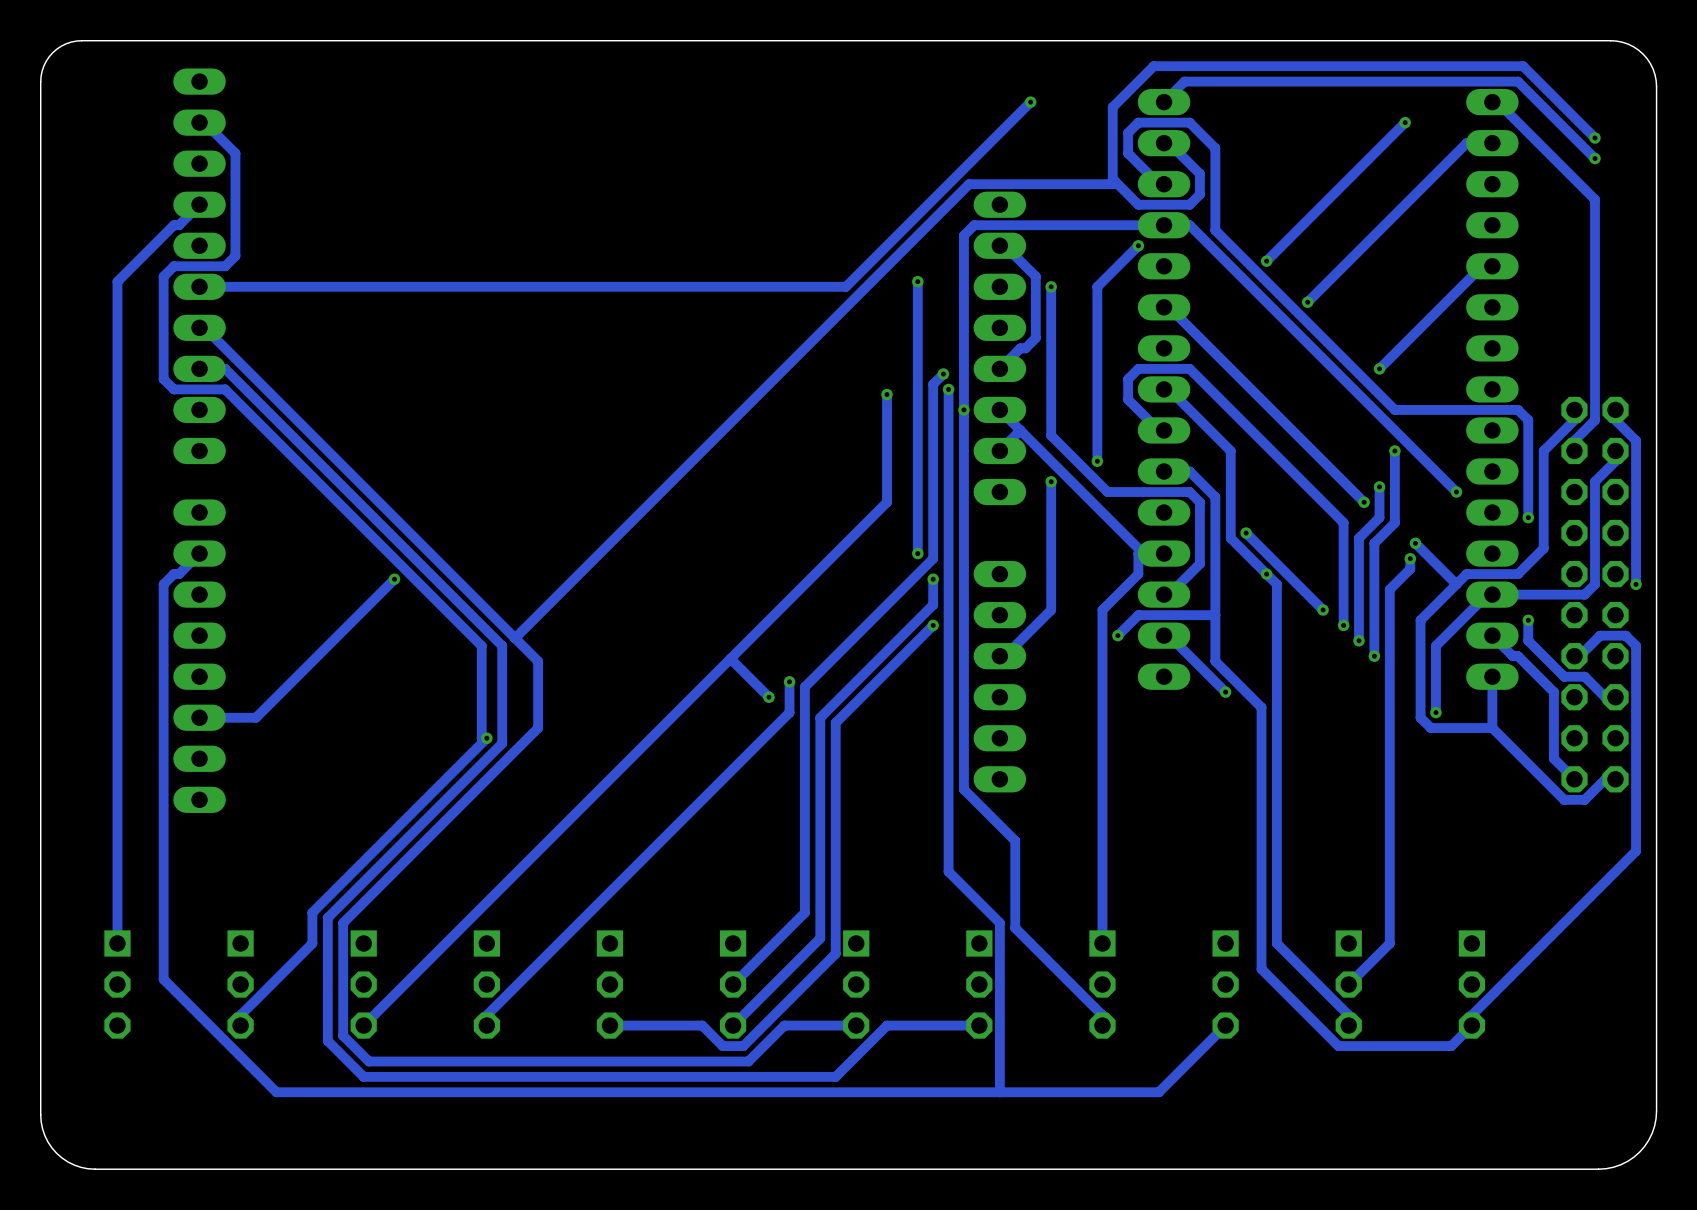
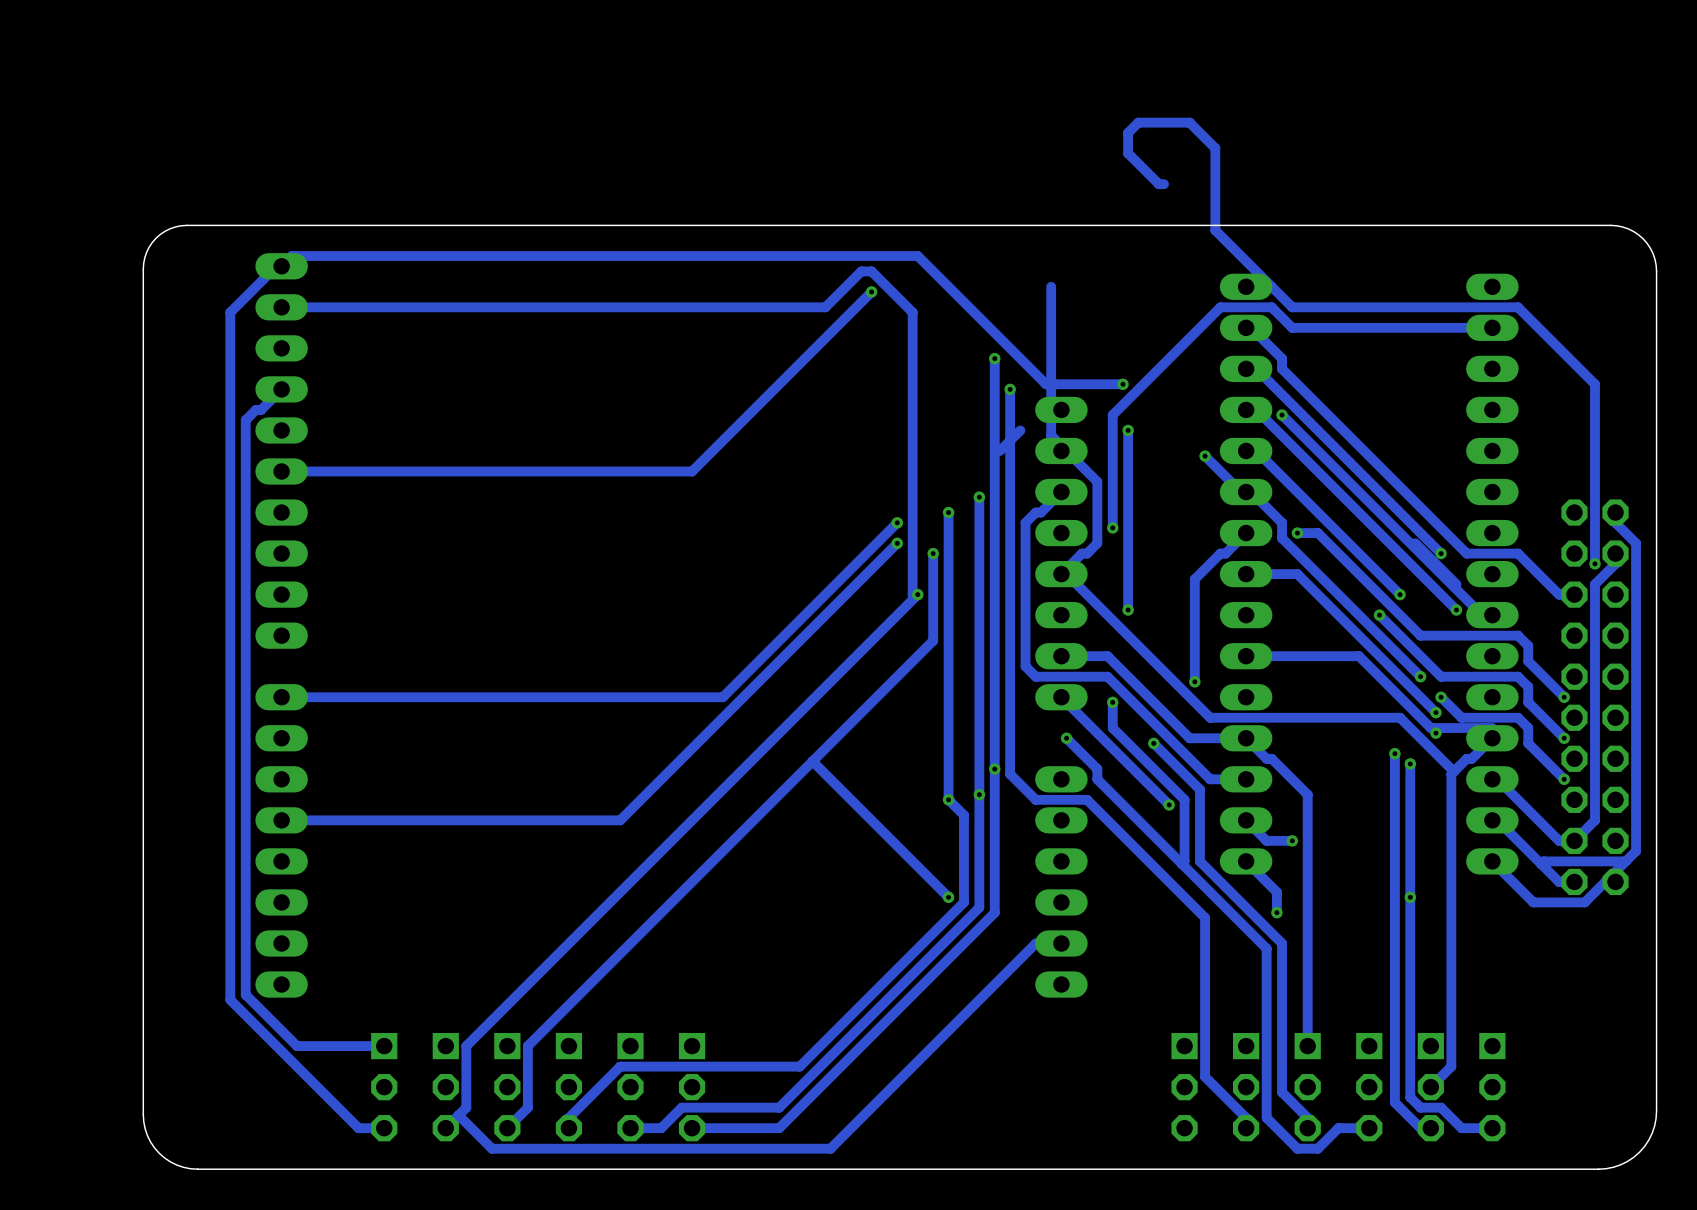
track: (1030, 102) (861, 271) -> (445, 1128) (466, 1107) (466, 1046) (917, 594) (912, 594) (912, 312) (871, 271) (861, 271)
via: (1030, 102) -> none
track: (1164, 102) (1184, 81) (1518, 81) (1594, 158) -> none
track: (1492, 102) (1497, 102) (1594, 199) (1594, 384) -> none
track: (199, 122) (204, 122) (235, 153) (235, 256) (225, 266) (173, 266) (163, 276) (163, 379) (173, 389) (225, 389) (481, 645) (481, 738) (486, 738) (312, 912) (312, 943) (240, 1015) (240, 1025) -> none
track: (1405, 122) (1266, 261) -> none
via: (1405, 122) -> none
track: (1594, 138) (1523, 66) (1153, 66) (1112, 107) (1112, 179) (1138, 204) (1189, 204) (1199, 194) (1199, 173) (1169, 143) (1164, 143) -> none
via: (1594, 138) -> none
track: (1492, 143) (1466, 143) (1307, 302) -> none
via: (1594, 158) -> none
track: (1115, 181) (1112, 184) (969, 184) (515, 638) -> none
track: (199, 204) (179, 225) (173, 225) (117, 281) (117, 943) -> none
track: (999, 245) (1005, 245) (1035, 276) (1035, 338) (1025, 348) (1020, 348) (999, 368) -> none
track: (1138, 245) (1097, 286) (1097, 461) -> none
via: (1138, 245) -> none
via: (1266, 261) -> none
part position: (199, 266) -> (281, 450)
track: (1492, 266) (1482, 266) (1379, 368) -> none
board edge: (1656, 271) (1656, 80) (1653, 68) (1643, 54) (1628, 44) (1616, 41) (81, 40) (61, 46) (46, 61) (40, 81) (41, 1121) (44, 1135) (51, 1147) (61, 1157) (81, 1167) (95, 1169) (197, 1169) -> (1656, 271) (1653, 253) (1643, 238) (1628, 228) (1610, 225) (186, 225) (165, 231) (149, 247) (143, 269) (143, 1114) (147, 1135) (159, 1153) (176, 1165) (197, 1169)
track: (917, 281) (917, 553) -> none
via position: (917, 281) -> (871, 291)
track: (845, 286) (199, 286) -> (845, 286) (825, 307) (281, 307)
via: (1051, 286) -> none
track: none -> (871, 291) (692, 471) (281, 471)
via: (1307, 302) -> none
track: (1164, 307) (1169, 307) (1364, 502) -> none
track: (1271, 307) (1189, 225) (974, 225) (963, 235) (963, 789) (1015, 840) (1015, 928) (1102, 1015) (1102, 1025) -> (1271, 307) (1220, 307) (1112, 415) (1112, 527)
track: (1292, 307) (1394, 409) (1518, 409) (1528, 420) (1528, 517) -> (1292, 307) (1518, 307) (1594, 384)
track: (199, 327) (204, 327) (538, 661) (538, 728) (343, 922) (343, 1035) (368, 1061) (748, 1061) (784, 1025) (856, 1025) -> none
track: none -> (1246, 327) (1251, 327) (1282, 358) (1282, 368) (1466, 553) (1518, 553) (1559, 594)
track: (1292, 327) (1456, 492) -> (1292, 327) (1492, 327)
part position: (999, 348) -> (1061, 553)
track: none -> (994, 358) (994, 912) (779, 1128) (692, 1128)
via: none -> (994, 358)
track: (199, 368) (225, 368) (502, 645) (502, 743) (327, 917) (327, 1040) (363, 1076) (835, 1076) (887, 1025) (979, 1025) -> none
track: none -> (1246, 368) (1256, 368) (1441, 553)
via: (1379, 368) -> none
track: (943, 374) (933, 384) (933, 553) -> none
via: (943, 374) -> none
track: none -> (1123, 384) (1046, 384) (917, 256) (291, 256) (281, 266) (281, 261) (230, 312) (230, 999) (358, 1128) (384, 1128)
via: none -> (1123, 384)
track: none -> (281, 389) (261, 409) (255, 409) (245, 420) (245, 994) (297, 1046) (384, 1046)
track: (948, 389) (948, 512) -> none
via: (948, 389) -> none
track: none -> (1010, 389) (1010, 774) (1035, 799) (1087, 799) (1205, 917) (1205, 1076) (1246, 1117) (1246, 1128)
via: none -> (1010, 389)
track: (1164, 389) (1169, 389) (1230, 450) (1230, 538) (1276, 584) (1276, 892) -> (1246, 861) (1276, 892)
part: (1164, 389) -> none
part: (1492, 389) -> none
track: (887, 394) (887, 502) (363, 1025) -> none
via: (887, 394) -> none
via: (963, 409) -> none
track: (999, 409) (1143, 553) -> none
track: none -> (1246, 409) (1256, 409) (1456, 610)
track: (1574, 409) (1574, 420) (1543, 450) (1543, 548) (1518, 574) (1466, 574) (1420, 620) (1420, 717) -> (1246, 656) (1359, 656) (1420, 717)
track: (1615, 409) (1615, 420) (1636, 440) (1636, 543) -> (1615, 512) (1615, 522) (1636, 543)
track: none -> (1282, 415) (1482, 615) (1492, 615)
via: none -> (1282, 415)
track: (1594, 420) (1574, 440) (1574, 450) -> none
track: none -> (1128, 430) (1128, 610)
via: none -> (1128, 430)
track: (1164, 430) (1158, 430) (1128, 399) (1128, 379) (1138, 368) (1189, 368) (1343, 522) (1343, 625) -> none
track: none -> (1246, 450) (1256, 450) (1400, 594)
track: (1394, 450) (1394, 522) (1374, 543) (1374, 656) -> none
via: (1394, 450) -> none
track: (1615, 450) (1615, 461) (1594, 481) -> (1594, 420) (1594, 481)
track: none -> (1205, 456) (1241, 492) (1251, 492) (1282, 522) (1282, 538) (1420, 676)
via: none -> (1205, 456)
via: (1097, 461) -> none
track: (1164, 471) (1189, 471) (1215, 497) (1215, 661) (1261, 707) (1261, 969) (1338, 1046) (1451, 1046) (1471, 1025) (1471, 1015) (1584, 902) -> (1492, 861) (1533, 902) (1584, 902)
track: (1051, 481) (1051, 610) (1005, 656) (999, 656) -> none
via: (1051, 481) -> none
track: (1097, 481) (1107, 492) (1189, 492) (1199, 502) (1199, 563) (1169, 594) (1164, 594) -> (1097, 481) (1097, 543) (1087, 553) (1081, 553) (1061, 574) (1066, 574) (1210, 717) (1400, 717) (1453, 771)
track: (1379, 486) (1379, 517) (1359, 538) (1359, 640) -> none
via: (1379, 486) -> none
track: none -> (1061, 492) (1040, 512) (1035, 512) (1025, 522) (1025, 666) (1035, 676) (1107, 676) (1210, 779) (1246, 779)
via: (1456, 492) -> none
track: none -> (979, 497) (979, 907) (779, 1107) (681, 1107) (661, 1128) (630, 1128)
via: none -> (979, 497)
via: (1364, 502) -> none
via: none -> (948, 512)
via: (1528, 517) -> none
track: none -> (897, 522) (722, 697) (281, 697)
via: none -> (897, 522)
via: none -> (1112, 527)
track: (1246, 533) (1323, 610) -> (1246, 533) (1225, 553) (1220, 553) (1194, 579) (1194, 681)
via: (1246, 533) -> none
track: none -> (1297, 533) (1317, 533) (1420, 635) (1518, 635) (1528, 645) (1528, 661) (1564, 697)
via: none -> (1297, 533)
track: none -> (897, 543) (620, 820) (281, 820)
via: none -> (897, 543)
via: (1415, 543) -> none
track: (199, 553) (179, 574) (173, 574) (163, 584) (163, 979) (276, 1092) (1158, 1092) (1225, 1025) -> none
via: (917, 553) -> none
via: none -> (933, 553)
track: (1164, 553) (1138, 553) (1138, 574) (1102, 610) (1102, 943) -> none
via: none -> (1441, 553)
track: none -> (1615, 553) (1615, 563) (1594, 584) (1594, 820) (1574, 840) (1559, 840) (1497, 779) (1492, 779)
track: (933, 558) (804, 686) (804, 912) (733, 984) -> (933, 558) (933, 579)
track: (1410, 558) (1410, 568) (1389, 589) (1389, 943) (1348, 984) -> none
via: (1410, 558) -> none
track: (1594, 563) (1594, 584) (1584, 594) (1574, 594) -> none
via: none -> (1594, 563)
part: none -> (1246, 574)
via: (1266, 574) -> none
part: none -> (1492, 574)
track: (394, 579) (255, 717) (199, 717) -> none
via: (394, 579) -> none
via: (933, 579) -> none
via: (1636, 584) -> none
via: none -> (917, 594)
via: none -> (1400, 594)
track: (1559, 594) (1487, 594) (1435, 645) (1435, 712) -> (1246, 574) (1297, 574) (1435, 712)
part position: (1594, 594) -> (1594, 697)
track: (933, 604) (820, 717) (820, 938) (733, 1025) -> (933, 604) (933, 640) (527, 1046) (527, 1107) (507, 1128)
via: (1323, 610) -> none
via: none -> (1456, 610)
track: (1215, 615) (1138, 615) (1117, 635) -> none
track: none -> (1379, 615) (1441, 676) (1518, 676) (1528, 686) (1528, 702) (1564, 738)
via: none -> (1379, 615)
track: (1528, 620) (1528, 640) (1564, 676) (1584, 676) (1605, 697) (1615, 697) -> none
via: (1528, 620) -> none
track: (933, 625) (835, 722) (835, 953) (743, 1046) (722, 1046) (702, 1025) (609, 1025) -> none
via: (933, 625) -> none
via: (1343, 625) -> none
via position: (1117, 635) -> (1128, 610)
track: (1164, 635) (1169, 635) (1225, 692) -> none
track: (1492, 635) (1512, 656) (1518, 656) (1553, 692) (1553, 758) (1574, 779) -> none
via: (1359, 640) -> none
track: (1636, 645) (1625, 635) (1600, 635) (1579, 656) (1574, 656) -> (1636, 645) (1636, 584)
part position: (199, 656) -> (281, 840)
track: none -> (1061, 656) (1107, 656) (1189, 738) (1246, 738) (1266, 758) (1271, 758) (1307, 794) (1307, 1046)
via: (1374, 656) -> none
track: (730, 658) (769, 697) -> none
part position: (999, 676) -> (1061, 881)
via: none -> (1420, 676)
track: (1492, 676) (1492, 728) (1564, 799) (1584, 799) (1605, 779) (1615, 779) -> none
track: (789, 681) (789, 712) (486, 1015) (486, 1025) -> none
via: (789, 681) -> none
via position: (1225, 692) -> (1194, 681)
via: (769, 697) -> none
track: none -> (1061, 697) (1169, 804)
track: none -> (1441, 697) (1461, 717) (1518, 717) (1528, 728) (1528, 743) (1564, 779)
via: none -> (1441, 697)
via: none -> (1564, 697)
track: none -> (1112, 702) (1112, 728) (1184, 799) (1184, 861) (1182, 863)
via: none -> (1112, 702)
via: none -> (1435, 733)
via: (486, 738) -> none
track: none -> (1066, 738) (1097, 769) (1097, 779) (1266, 948) (1266, 1117) (1297, 1148) (1317, 1148) (1338, 1128) (1369, 1128)
via: none -> (1066, 738)
track: none -> (1492, 738) (1471, 758) (1466, 758) (1451, 774) (1451, 1066) (1430, 1087)
via: none -> (1564, 738)
track: none -> (1153, 743) (1199, 789) (1199, 861) (1282, 943) (1282, 1092) (1307, 1117) (1307, 1128)
via: none -> (1153, 743)
track: none -> (1394, 753) (1394, 1102) (1420, 1128) (1430, 1128)
via: none -> (1394, 753)
track: none -> (812, 761) (948, 897)
track: none -> (1410, 763) (1410, 1097) (1420, 1107) (1441, 1107) (1461, 1128) (1492, 1128)
via: none -> (1410, 763)
via: none -> (994, 769)
via: none -> (1564, 779)
via: none -> (979, 794)
track: (948, 799) (948, 871) (999, 922) (999, 1092) -> (948, 799) (963, 815) (963, 902) (799, 1066) (620, 1066) (568, 1117) (568, 1128)
via: none -> (948, 799)
via: none -> (1169, 804)
track: none -> (1246, 820) (1266, 840) (1292, 840)
track: none -> (1492, 820) (1497, 820) (1559, 881) (1574, 881)
via: none -> (1292, 840)
track: none -> (1625, 861) (1543, 861) (1541, 863)
via: none -> (948, 897)
via: none -> (1410, 897)
track: (1276, 912) (1276, 943) (1348, 1015) (1348, 1025) -> none
via: none -> (1276, 912)
track: none -> (1061, 943) (1035, 943) (830, 1148) (491, 1148) (458, 1115)
part: (117, 984) -> none
part: (240, 984) -> none
part: (363, 984) -> none
part: (486, 984) -> none
part: (609, 984) -> none
part: (733, 984) -> none
part: (856, 984) -> none
part: (979, 984) -> none
part: (1102, 984) -> none
part: (1225, 984) -> none
part: (1348, 984) -> none
part: (1471, 984) -> none
part: none -> (384, 1087)
part: none -> (445, 1087)
part: none -> (507, 1087)
part: none -> (568, 1087)
part: none -> (630, 1087)
part: none -> (692, 1087)
part: none -> (1184, 1087)
part: none -> (1246, 1087)
part: none -> (1307, 1087)
part: none -> (1369, 1087)
part: none -> (1430, 1087)
part: none -> (1492, 1087)

